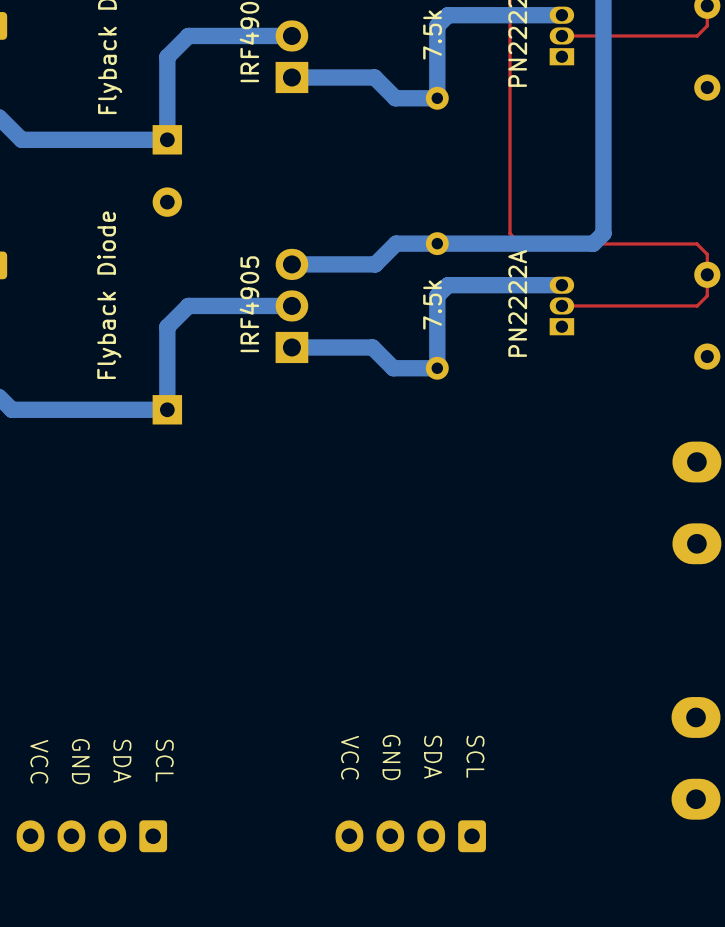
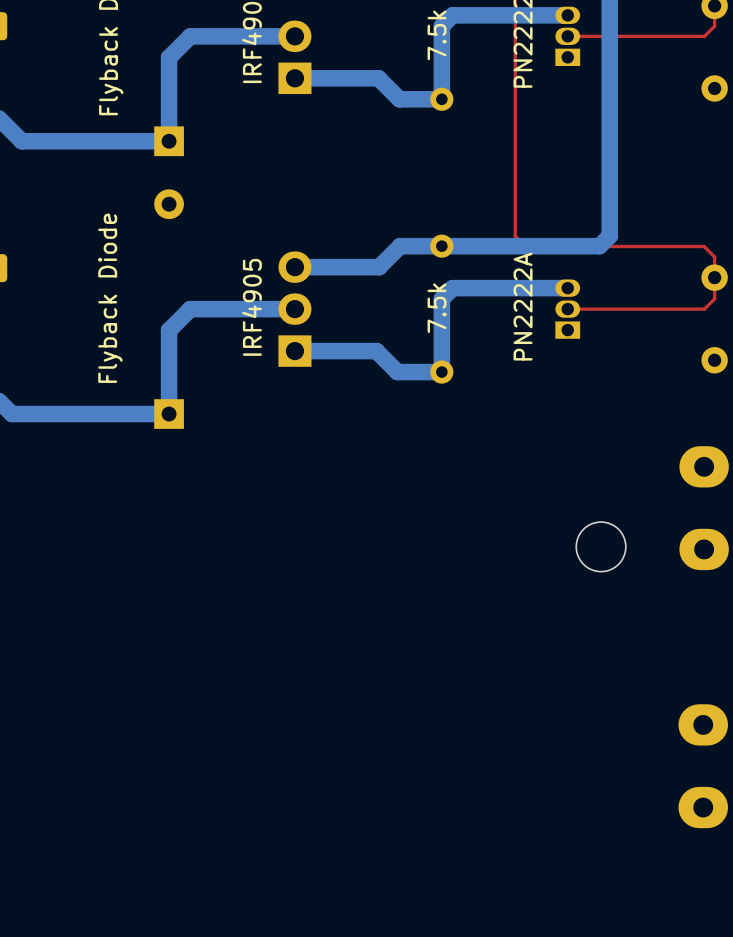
round board edge: none -> [575, 521, 627, 573]
text: SCL (475, 756) -> none
text: VCC (350, 757) -> none
text: GND (391, 757) -> none
text: SDA (433, 757) -> none
text: SCL (164, 760) -> none
text: VCC (39, 761) -> none
text: GND (80, 761) -> none
text: SDA (122, 761) -> none
part: (91, 836) -> none
part: (410, 836) -> none

